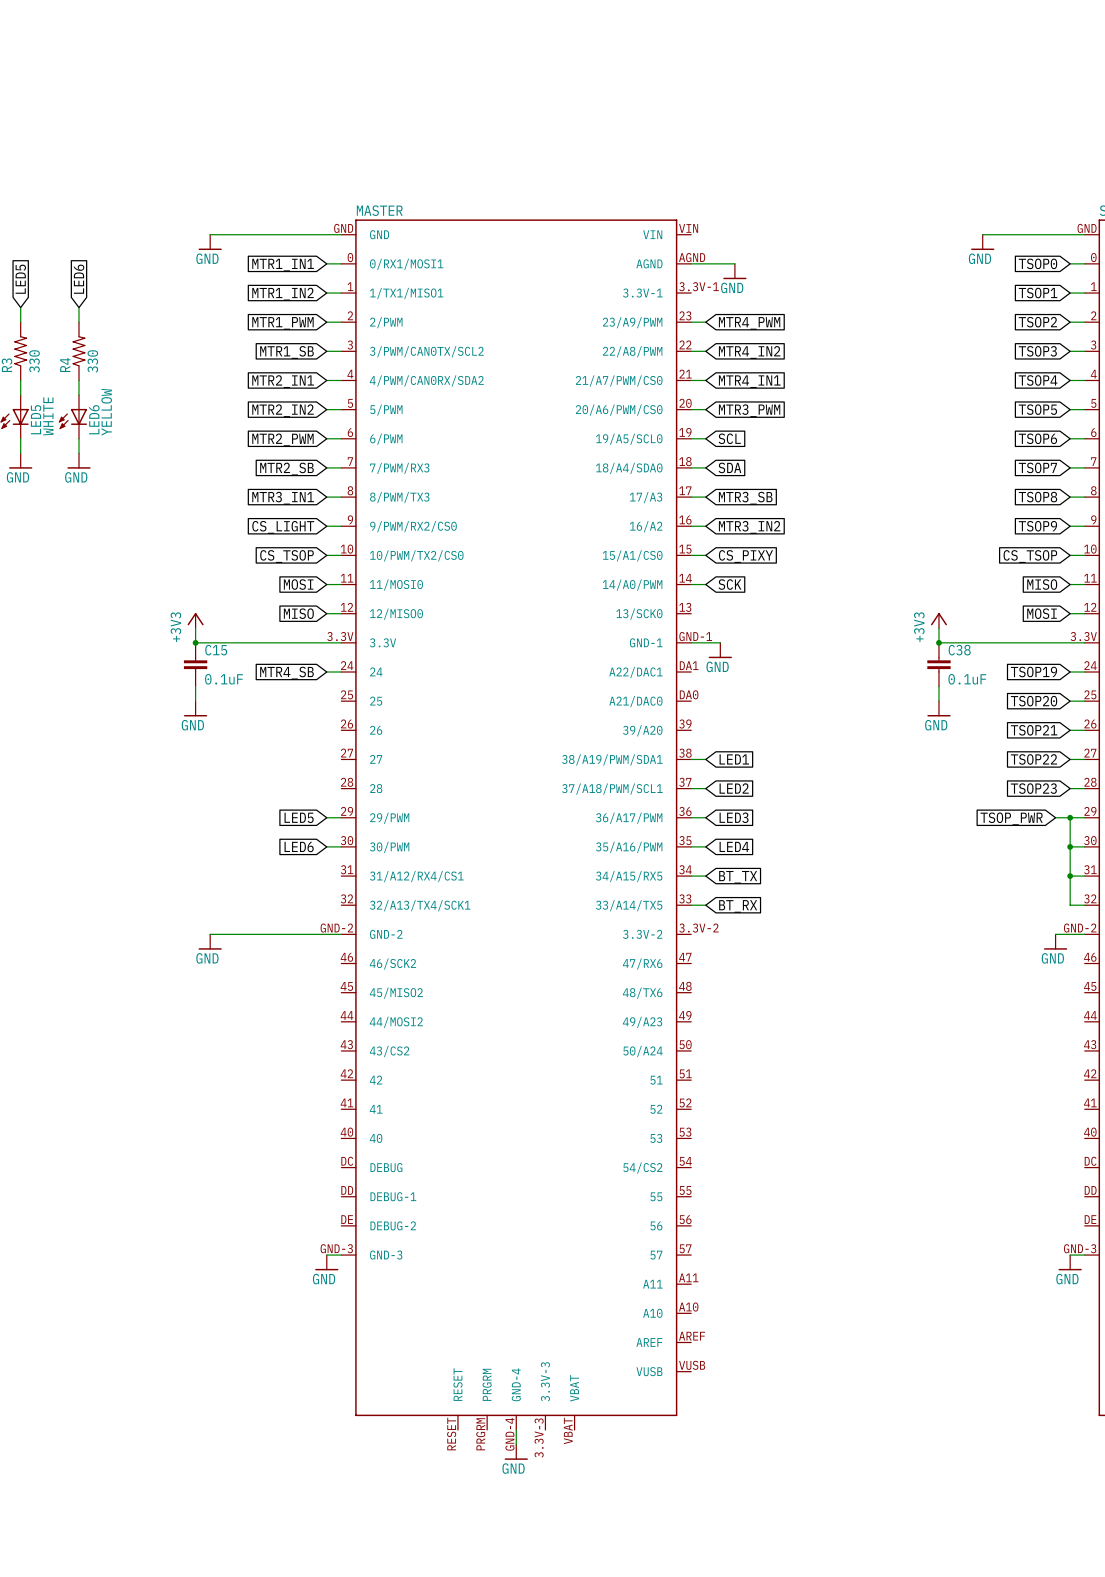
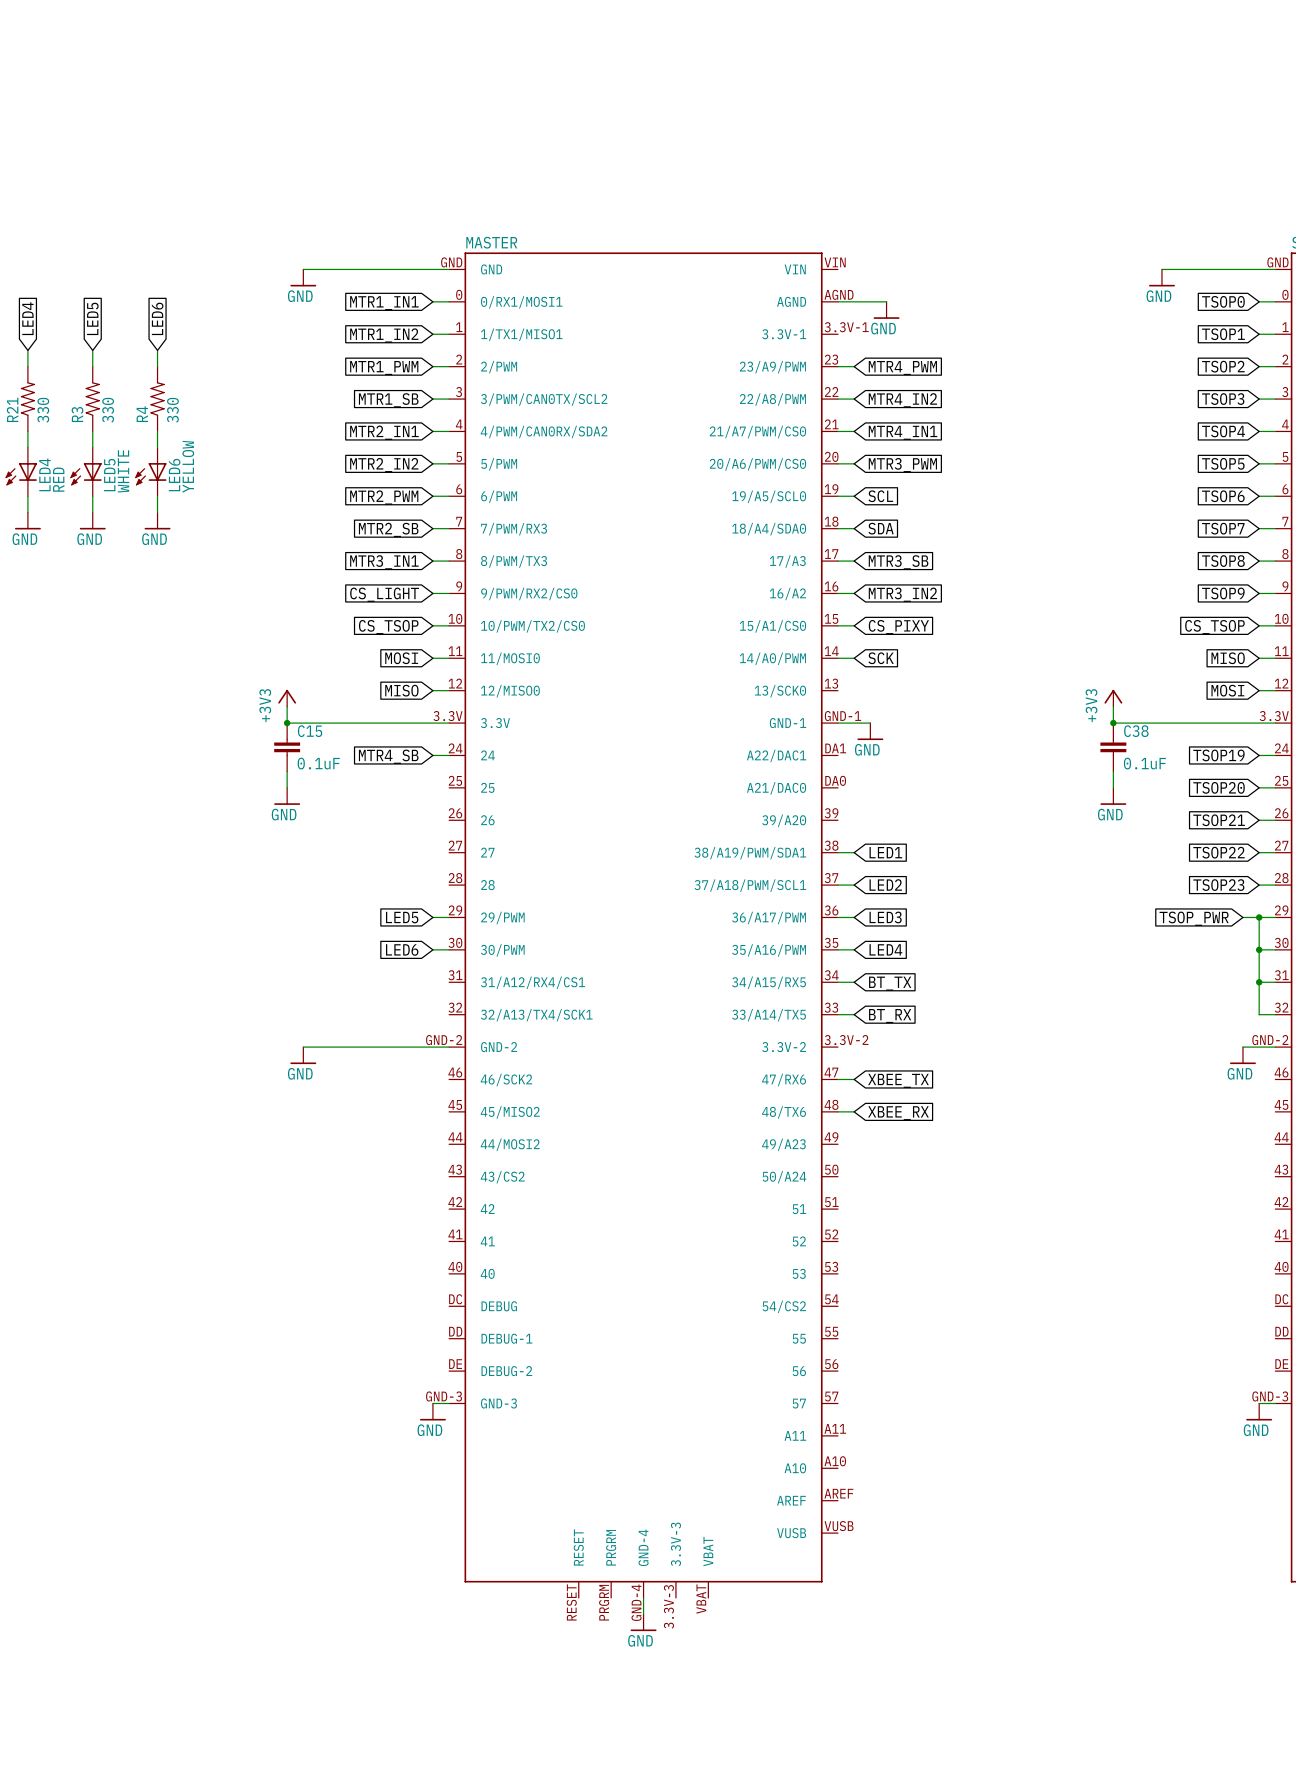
wire: none -> (837, 1079) (854, 1079)
global label: none -> XBEE_TX (898, 1080)
wire: none -> (837, 1111) (854, 1111)
global label: none -> XBEE_RX (898, 1113)

